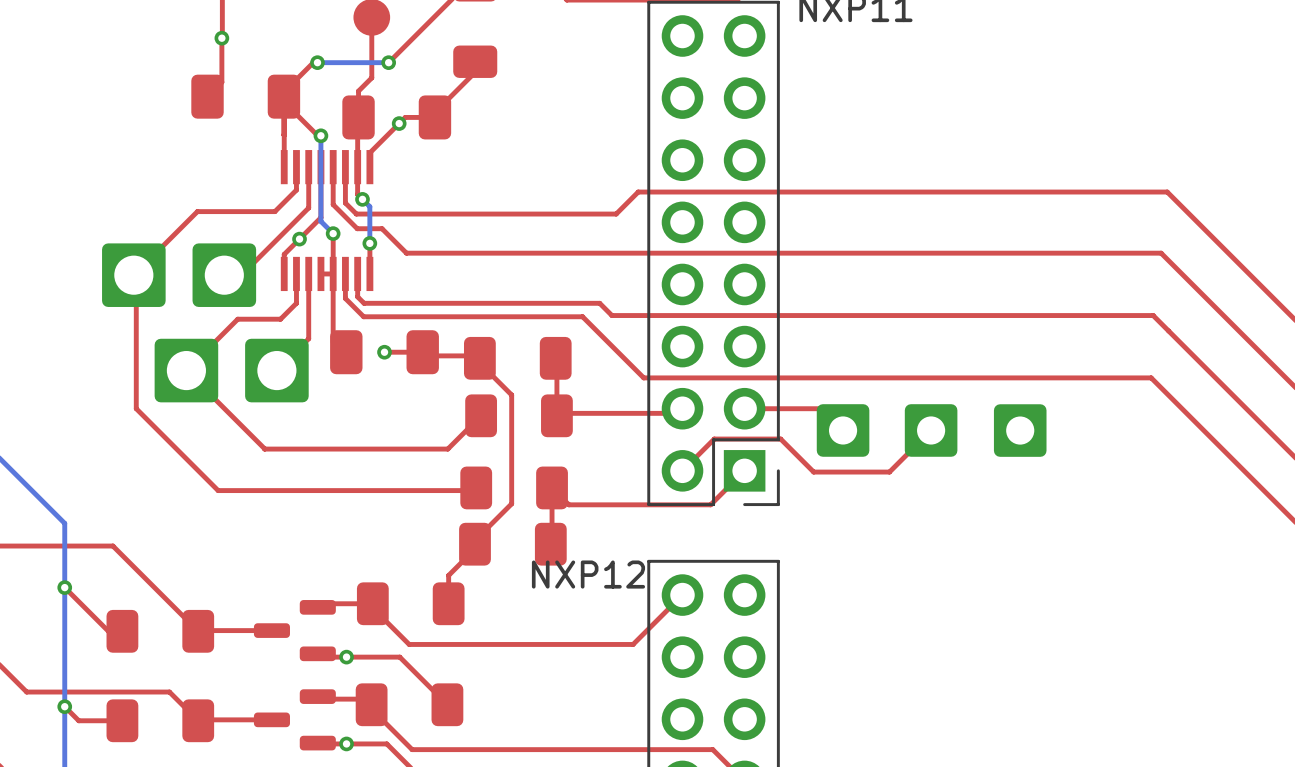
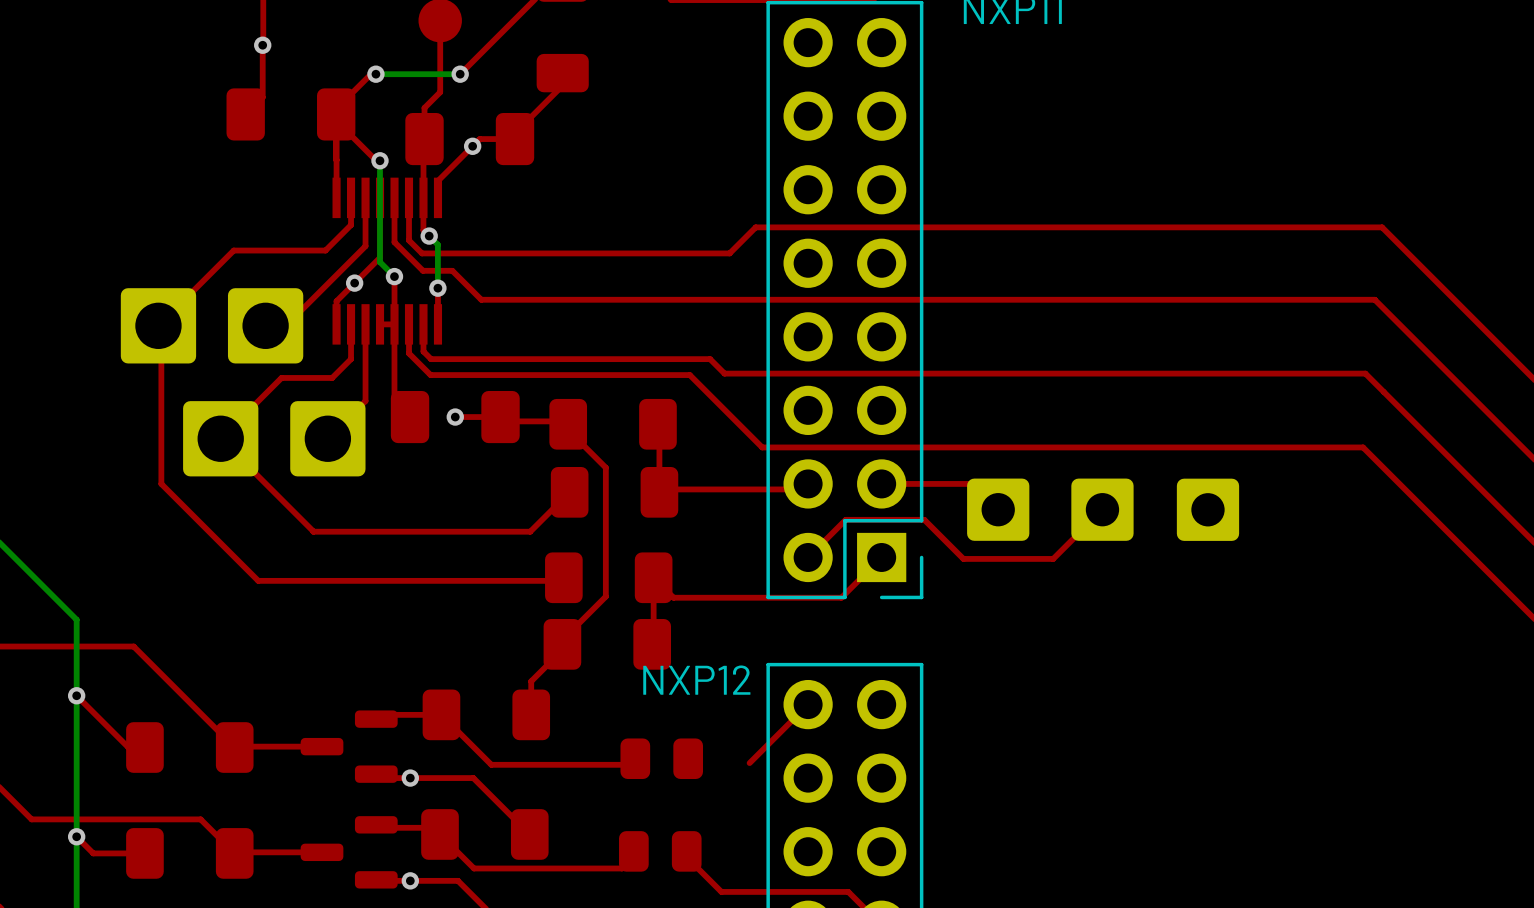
top track: (372, 603) (372, 608) (409, 644) (633, 644) -> (441, 714) (491, 764) (629, 764) (635, 758)
part: none -> (661, 758)
top track: (371, 704) (371, 709) (412, 749) (712, 749) (716, 753) -> (440, 834) (474, 868) (621, 868) (633, 856) (633, 851)
part: none -> (660, 851)
top track: none -> (686, 851) (686, 857) (721, 891) (848, 891)

